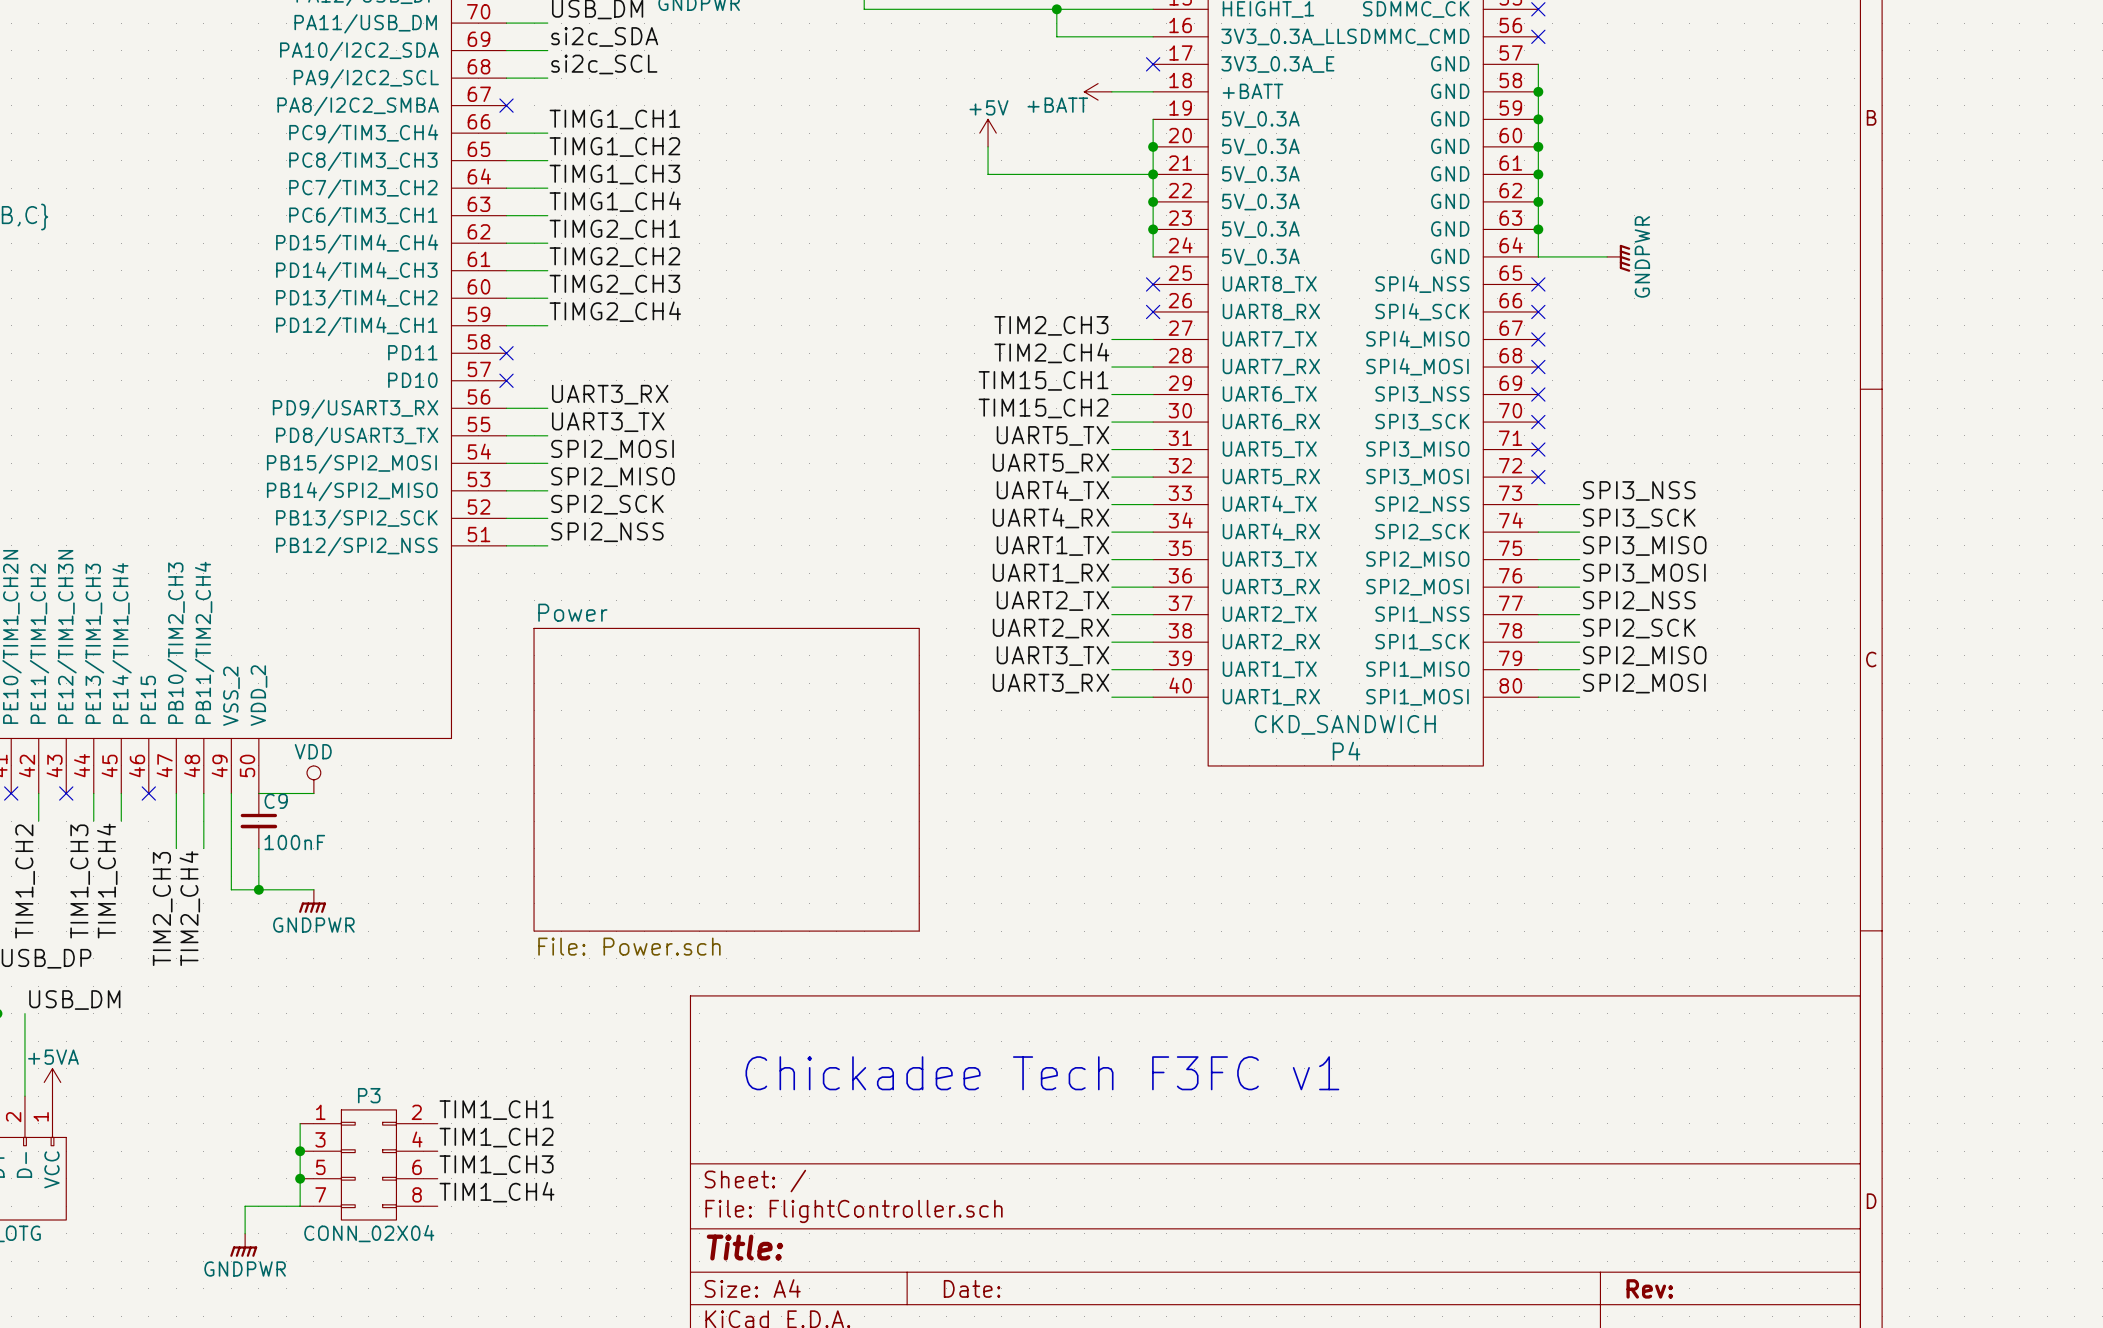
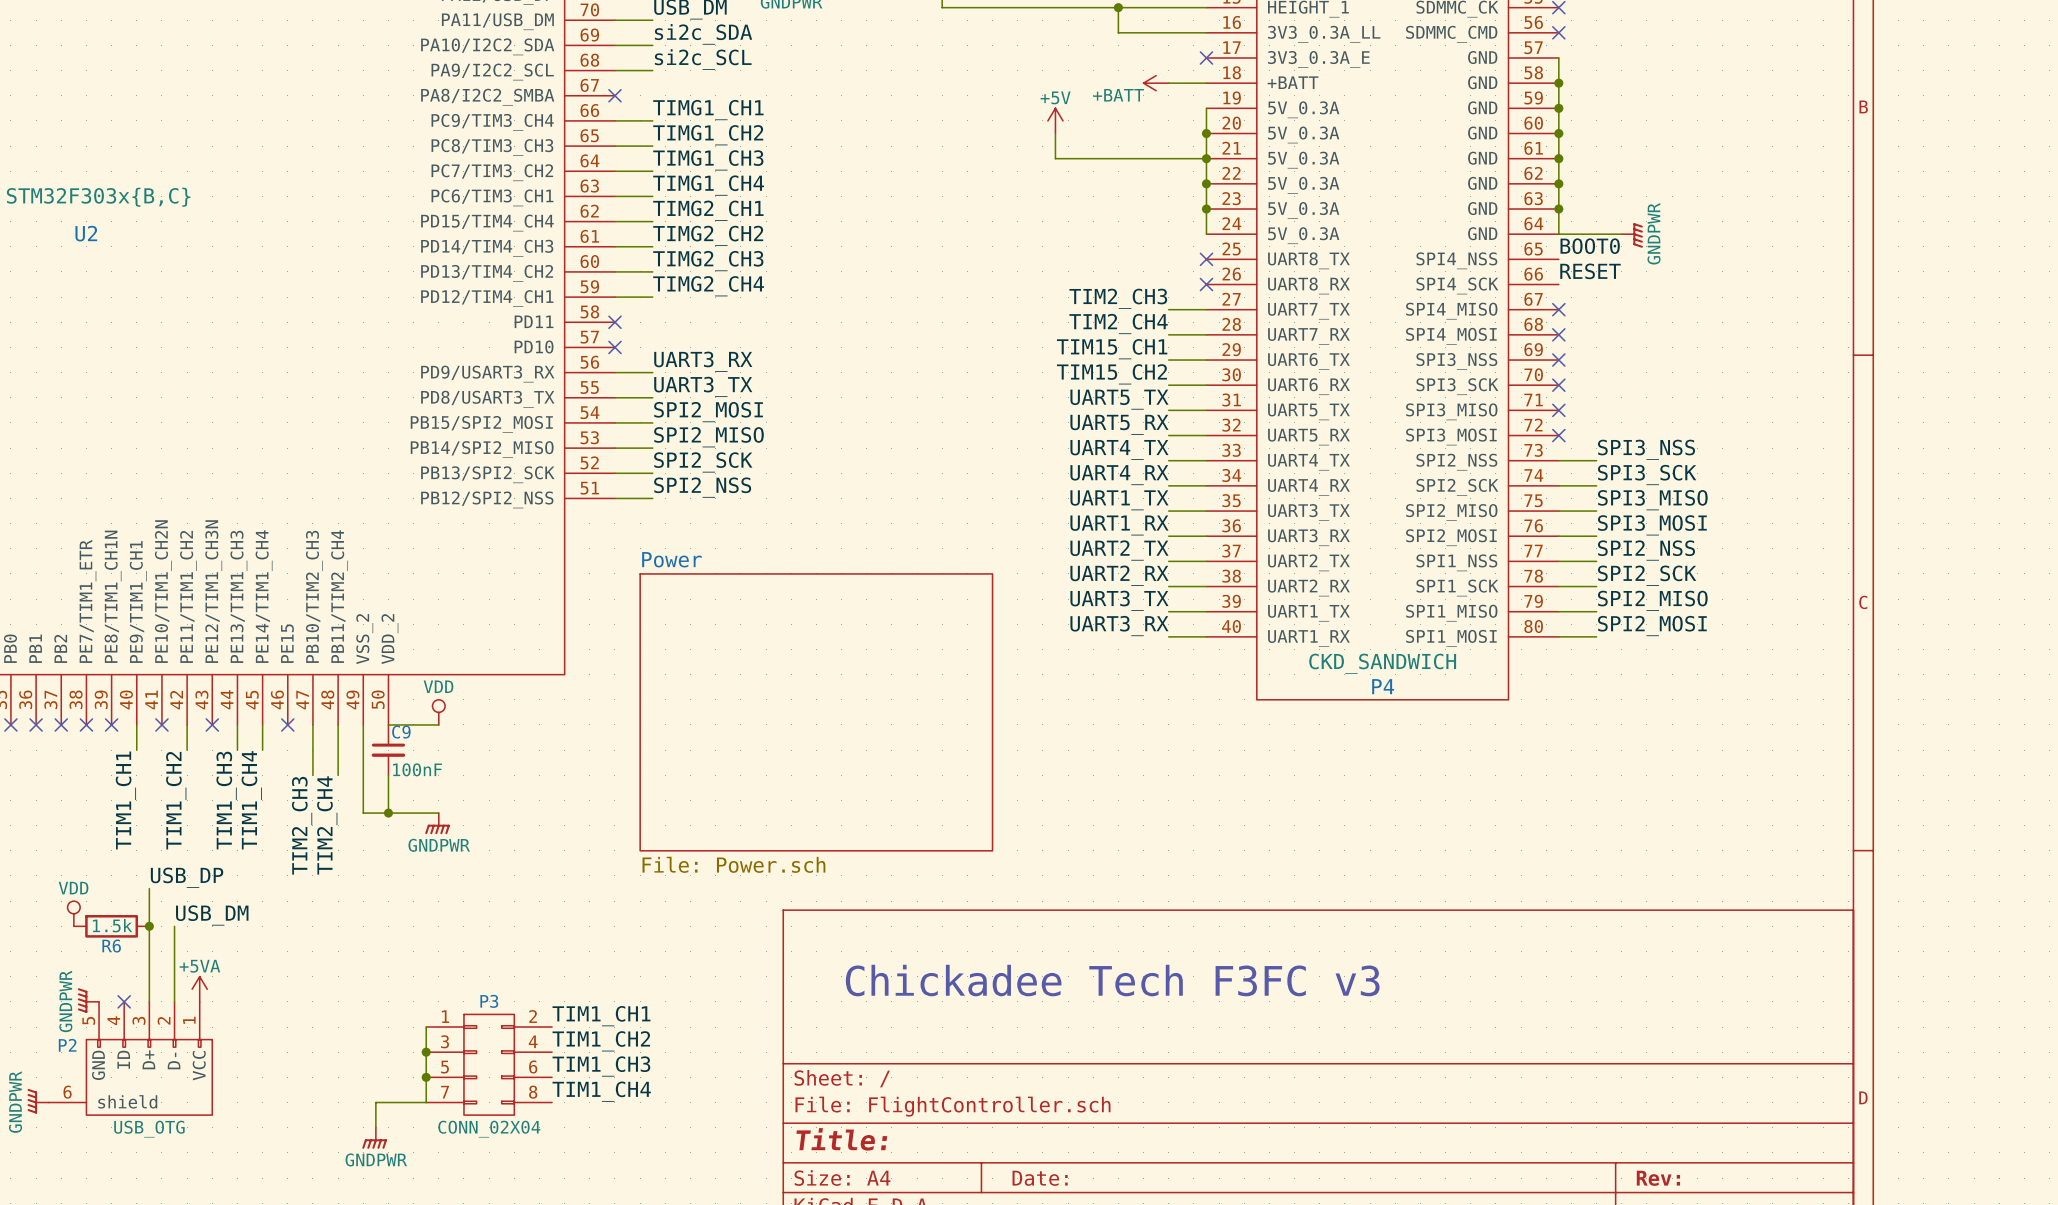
label: none -> BOOT0 (1590, 246)
no-connect mark: (1538, 284) -> none
label: none -> RESET (1590, 271)
no-connect mark: (1538, 311) -> none
text: Chickadee Tech F3FC v1 (1042, 1073) -> Chickadee Tech F3FC v3 (1112, 980)

